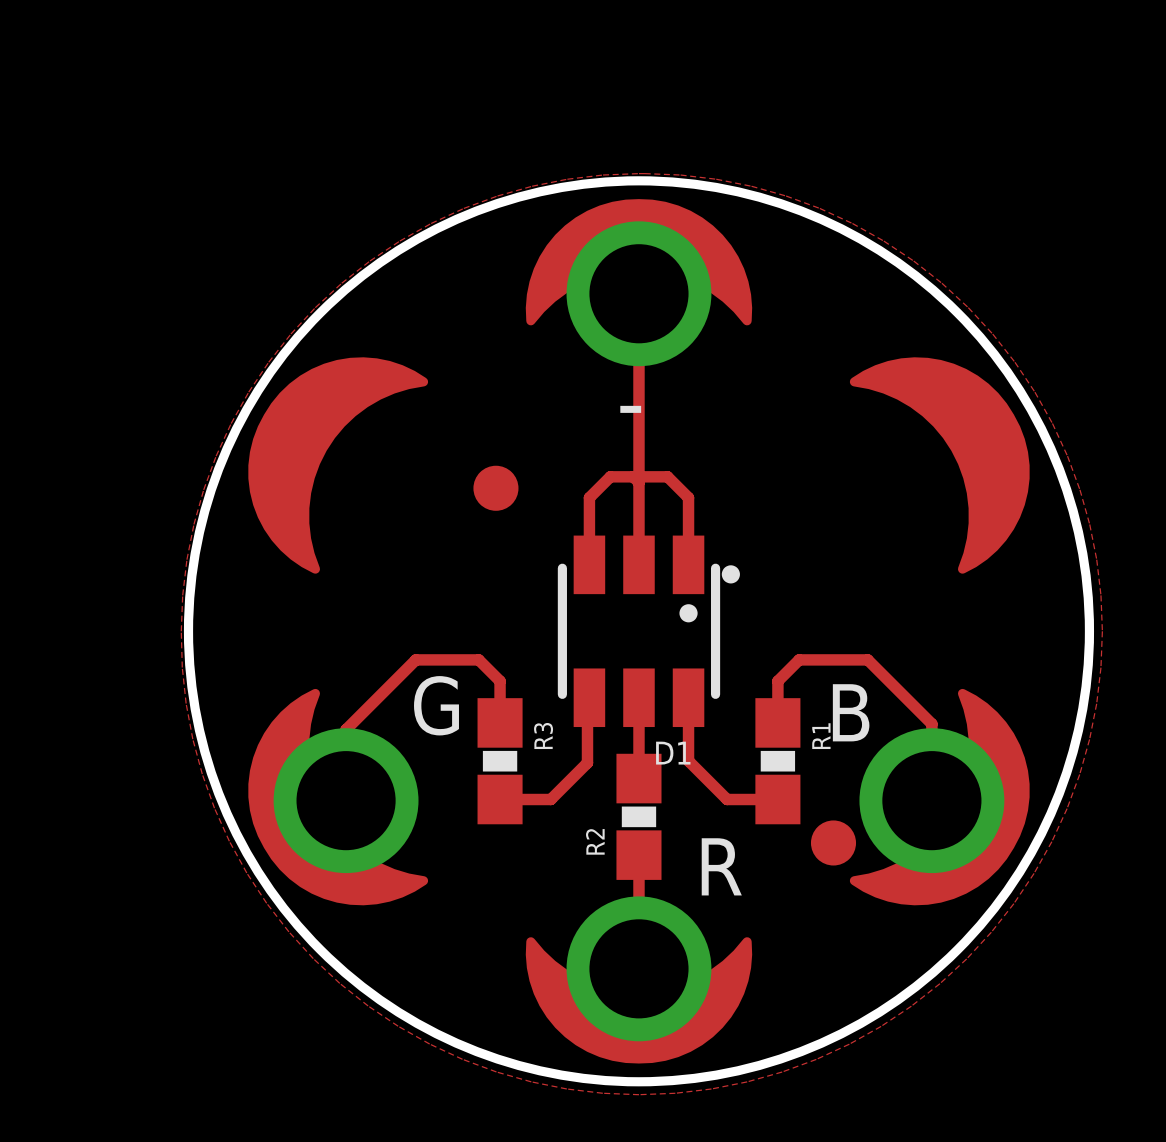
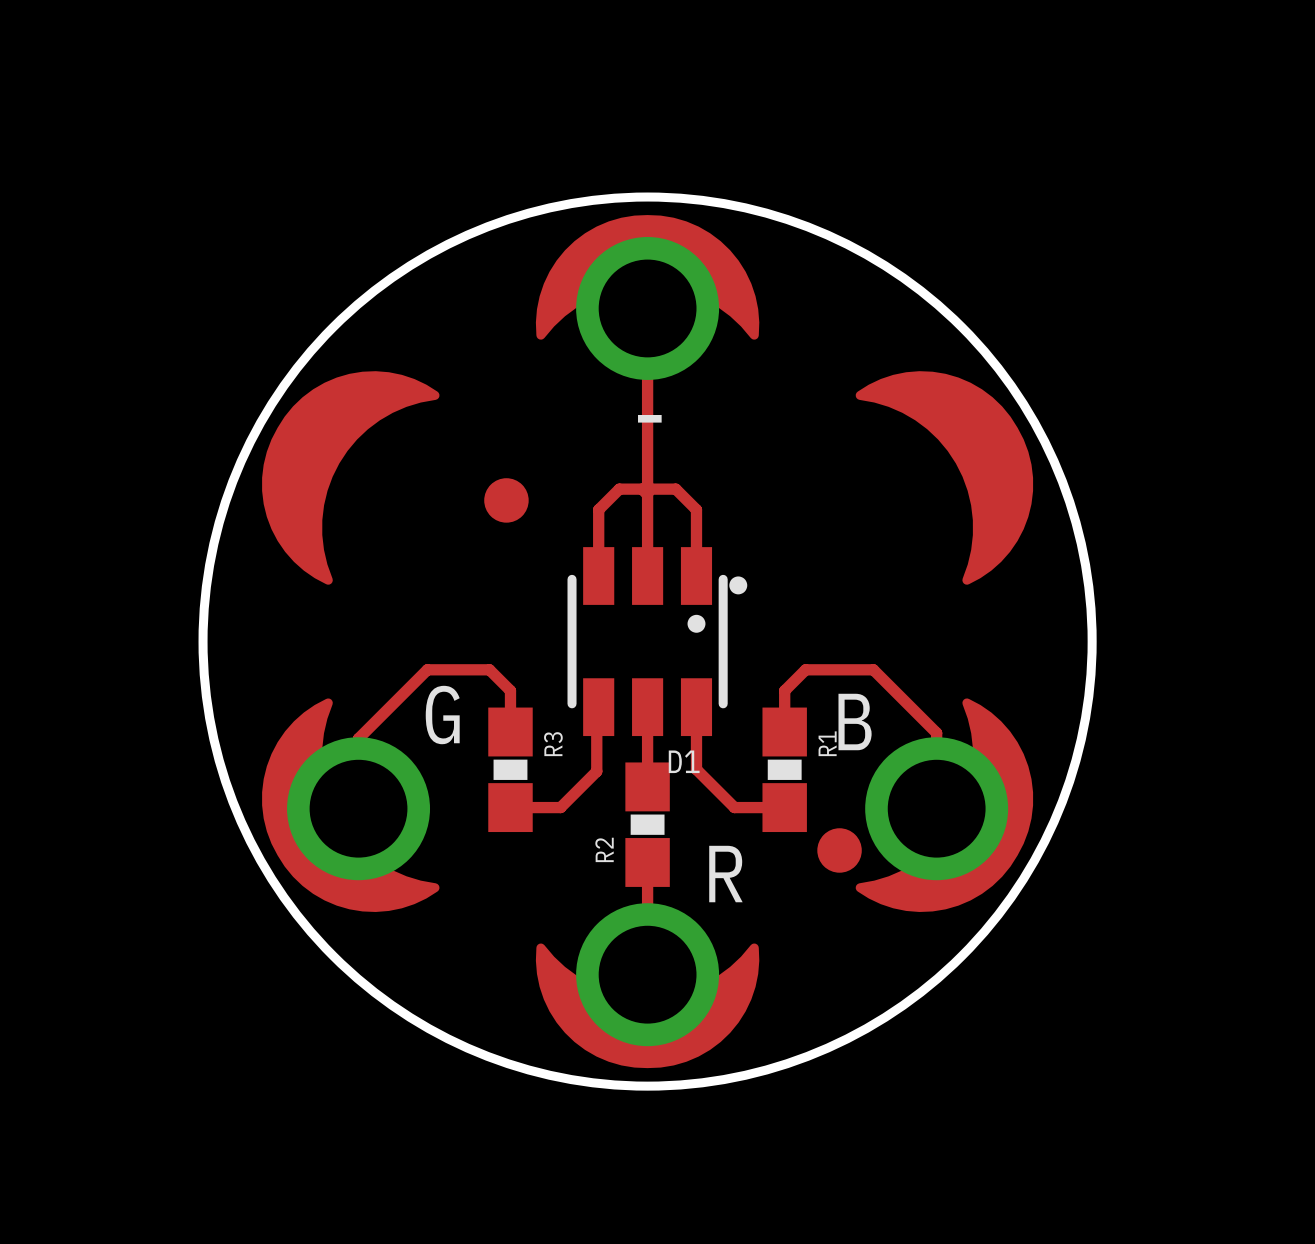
zone outline: (638, 173) (603, 175) (532, 186) (463, 208) (399, 241) (341, 283) (315, 307) (290, 334) (248, 392) (216, 456) (193, 524) (182, 595) (181, 631) (182, 667) (192, 739) (214, 808) (246, 872) (266, 903) (313, 958) (368, 1005) (429, 1044) (462, 1059) (496, 1071) (566, 1088) (638, 1094) (711, 1089) (782, 1072) (816, 1059) (849, 1044) (911, 1006) (966, 958) (1013, 903) (1051, 841) (1067, 808) (1079, 774) (1096, 703) (1102, 631) (1096, 559) (1089, 524) (1067, 456) (1034, 392) (1014, 362) (968, 307) (941, 283) (883, 241) (819, 208) (786, 196) (716, 179) (680, 175) (638, 173) -> none

